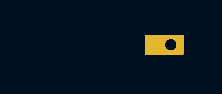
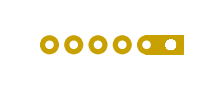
part: none -> (110, 44)

